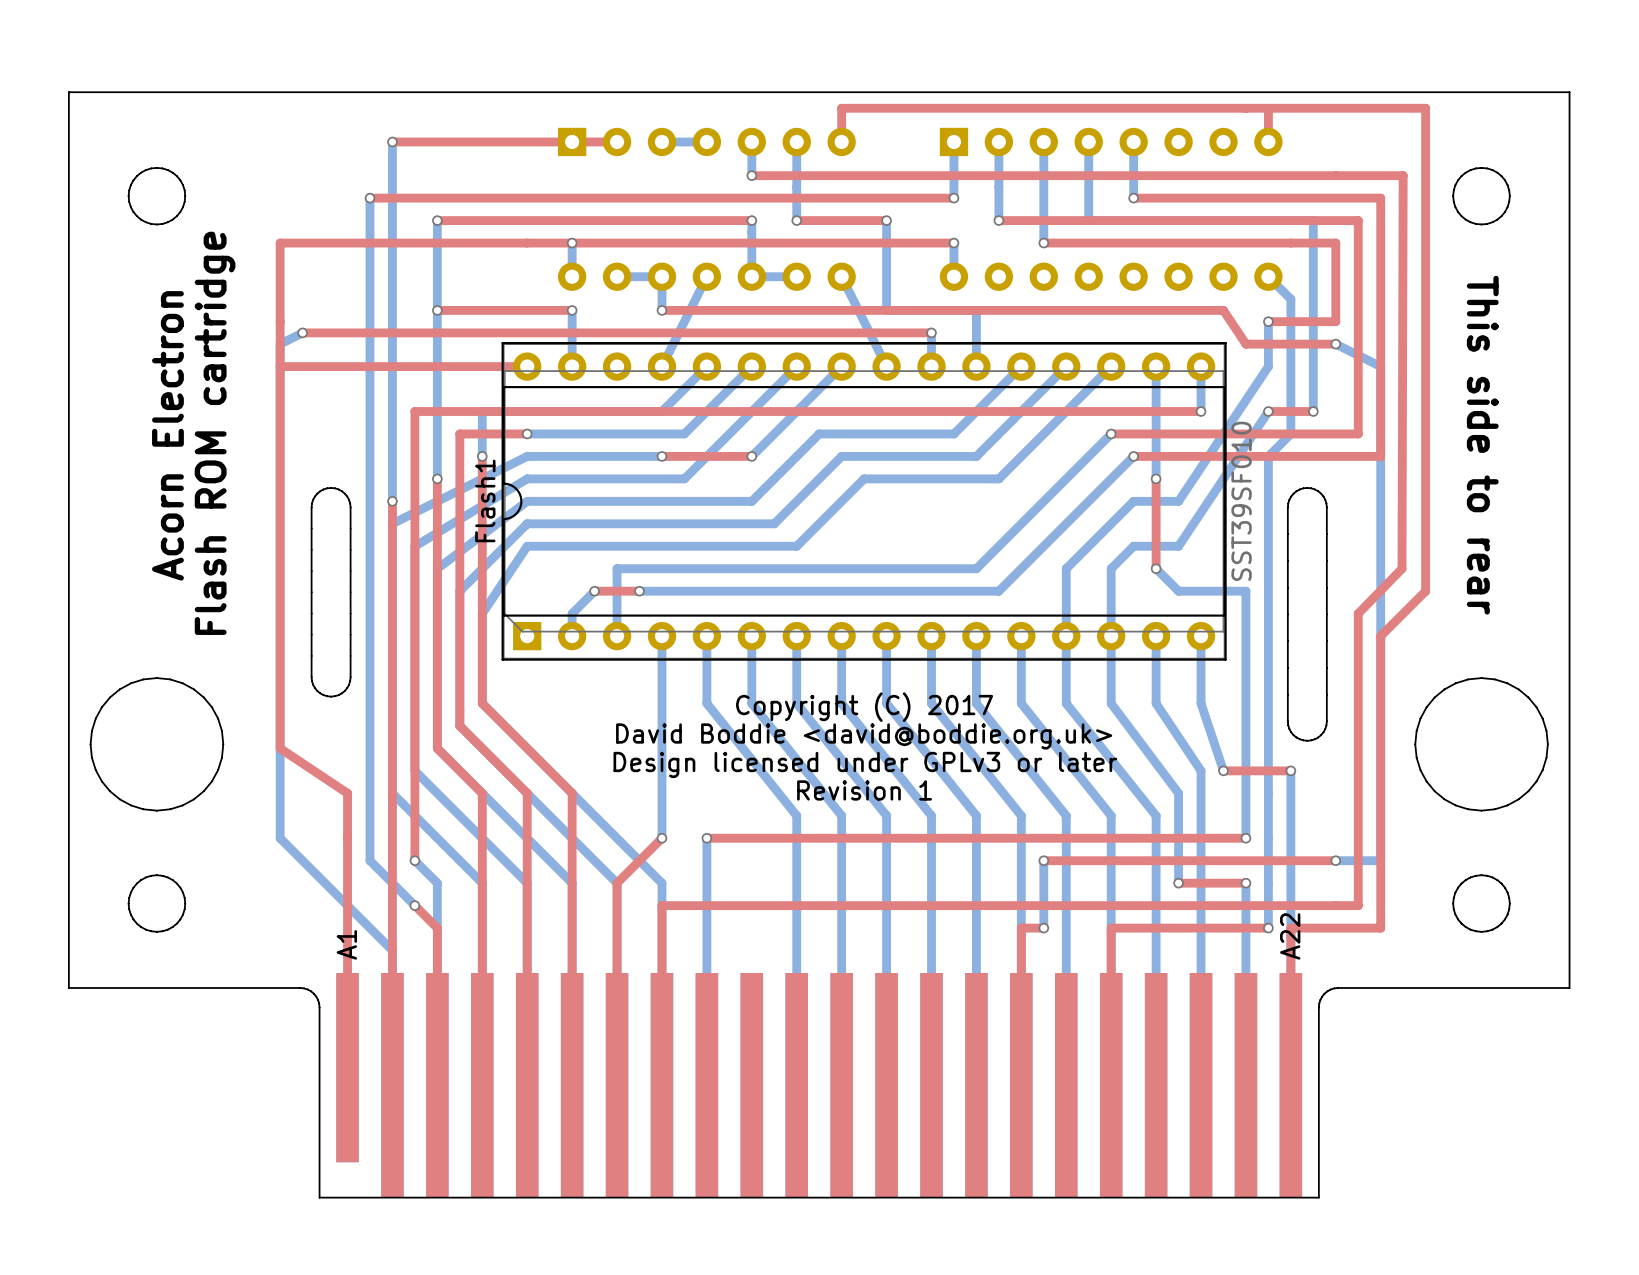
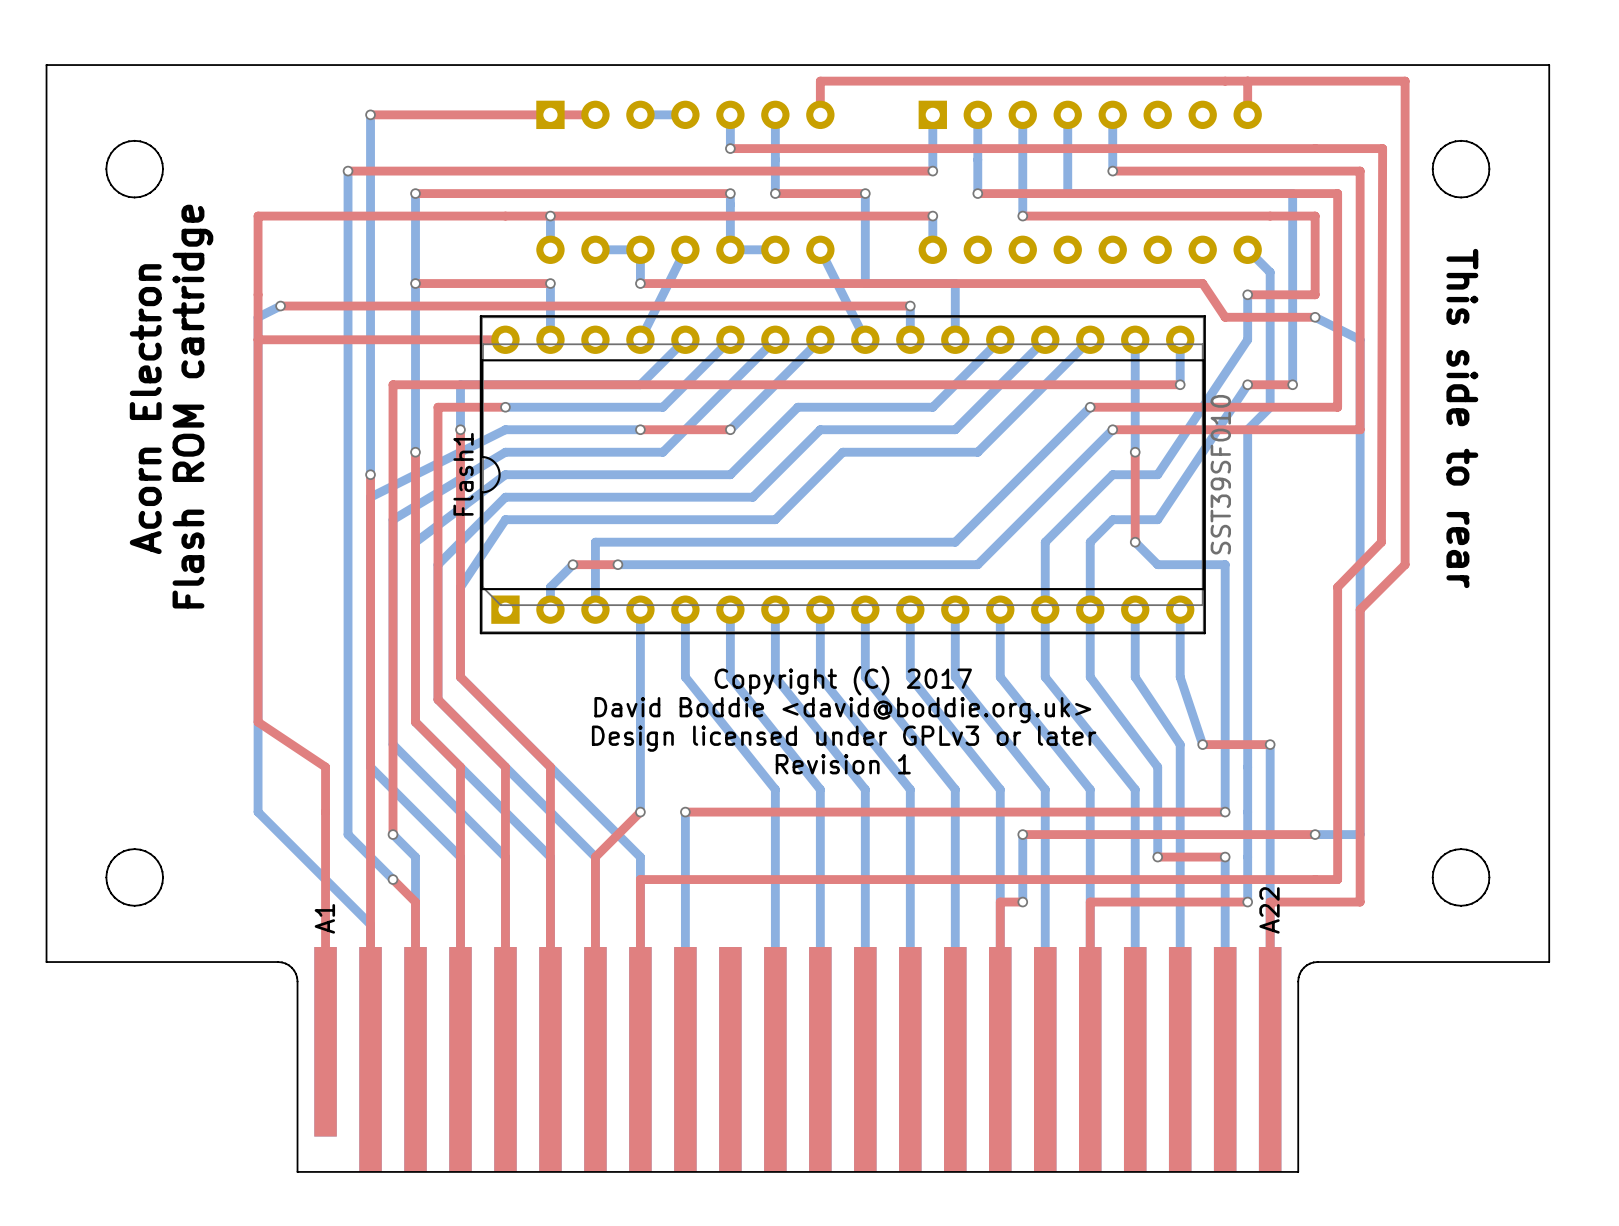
board edge: (331, 487) (344, 493) (350, 507) (350, 681) (341, 693) (331, 696) (317, 690) (311, 677) (311, 503) (320, 491) (331, 487) -> none
board edge: (1307, 487) (1321, 493) (1326, 507) (1326, 721) (1321, 735) (1307, 740) (1293, 735) (1287, 721) (1287, 507) (1293, 493) (1307, 487) -> none
board edge: (156, 678) (182, 683) (203, 697) (218, 718) (223, 744) (218, 770) (203, 791) (182, 805) (156, 810) (131, 805) (109, 791) (95, 770) (90, 744) (95, 718) (109, 697) (131, 683) (156, 678) -> none
board edge: (1481, 678) (1507, 683) (1528, 697) (1542, 718) (1547, 744) (1542, 770) (1528, 791) (1507, 805) (1481, 810) (1455, 805) (1434, 791) (1420, 770) (1415, 744) (1420, 718) (1434, 697) (1455, 683) (1481, 678) -> none

